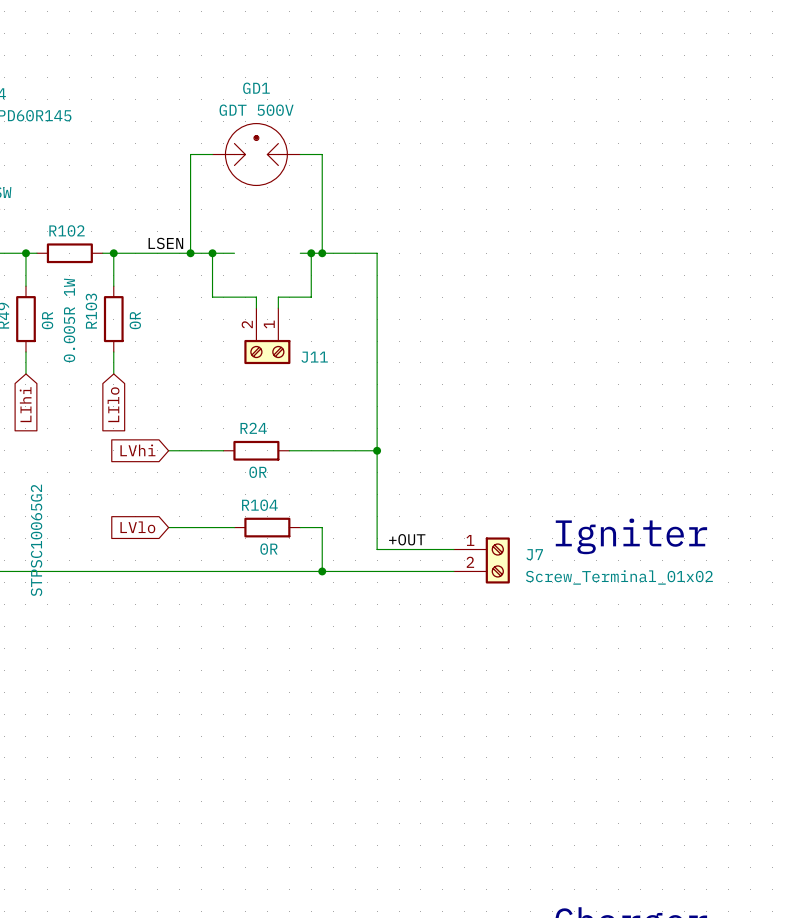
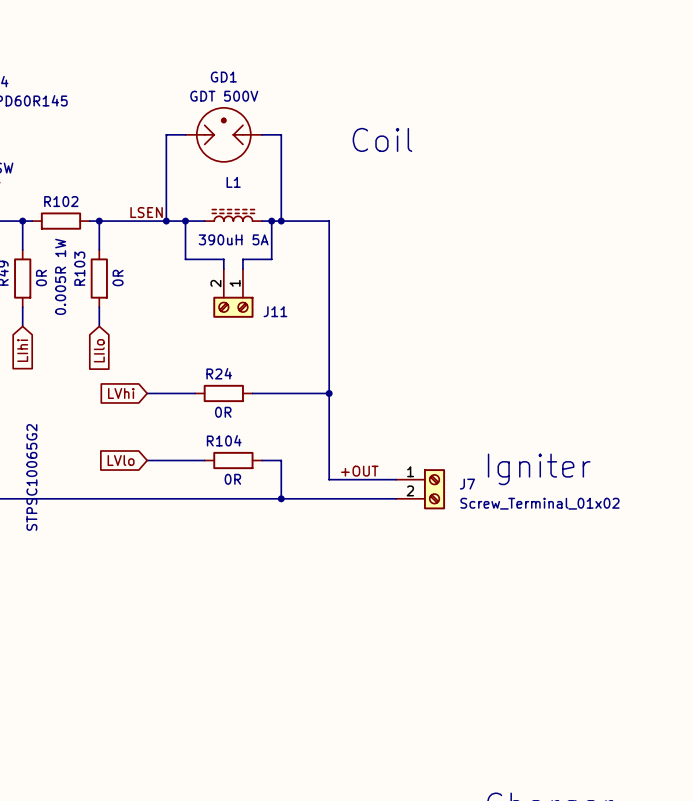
text: none -> Coil (382, 139)
L1: none -> 390uH 5A (233, 215)

